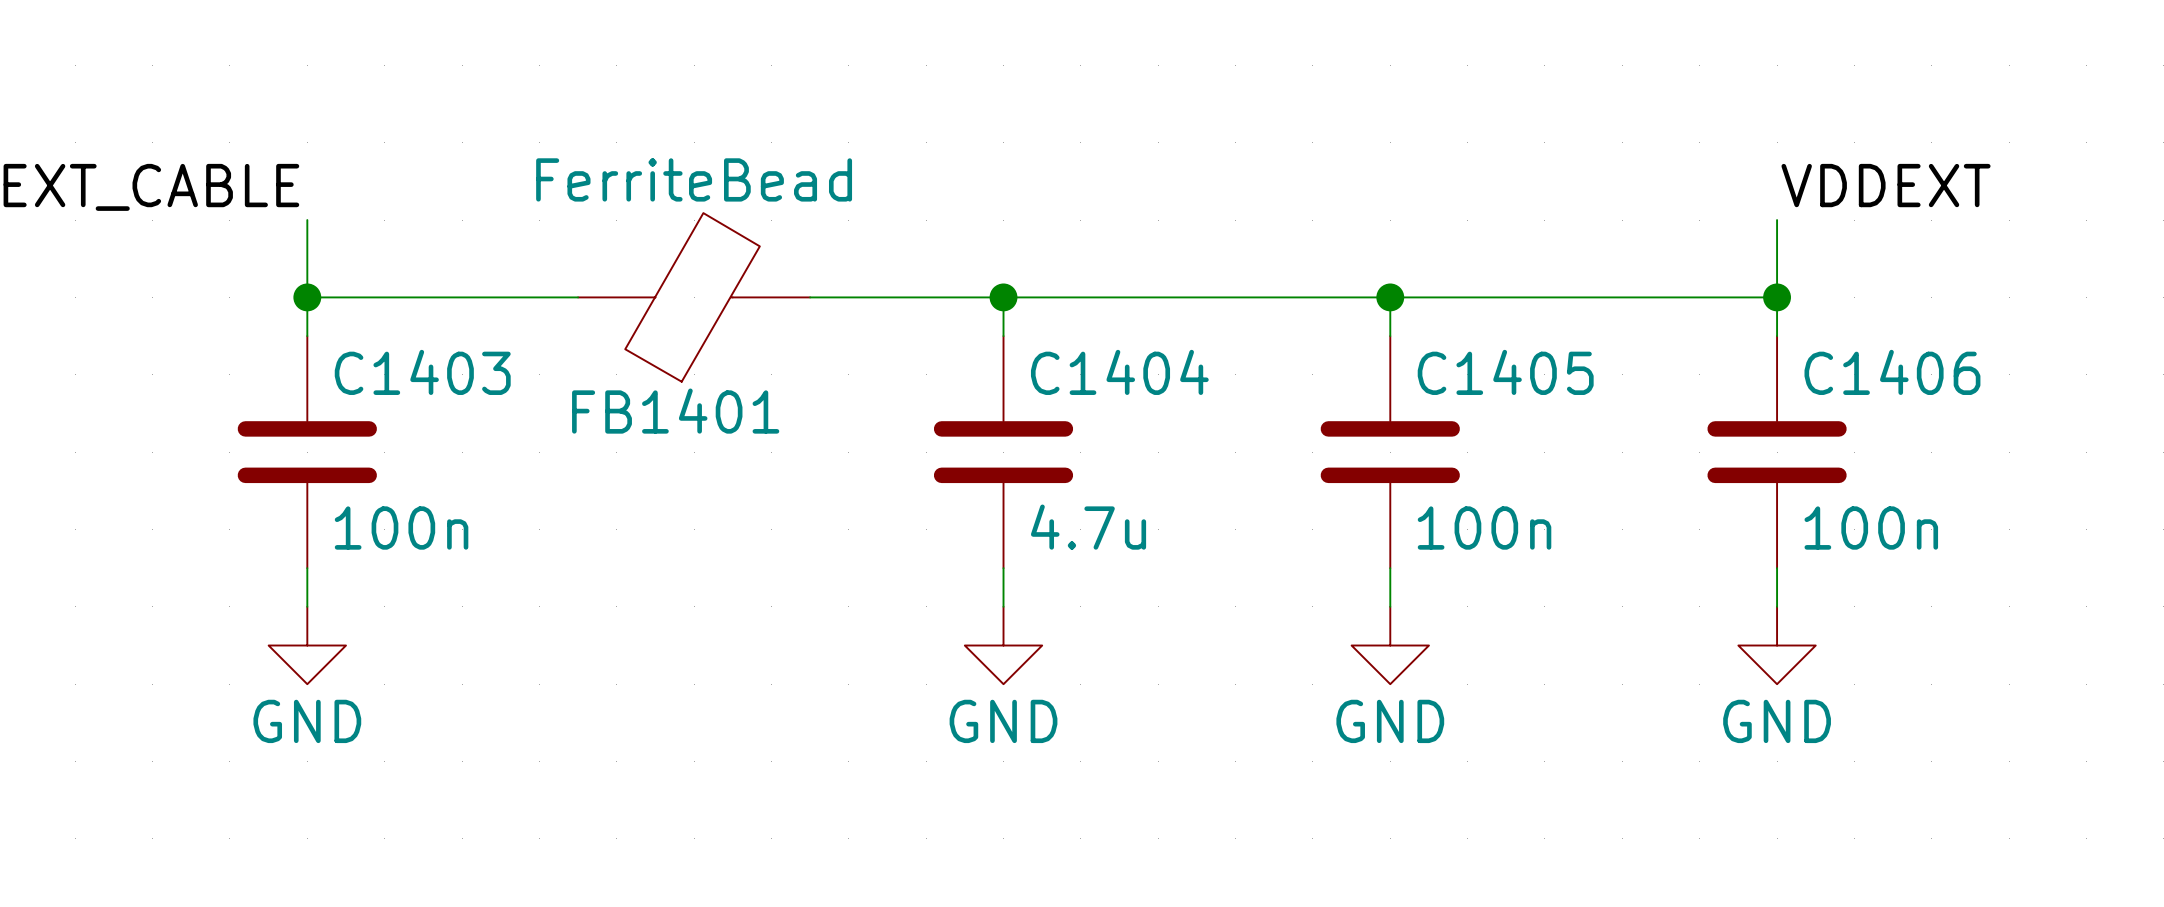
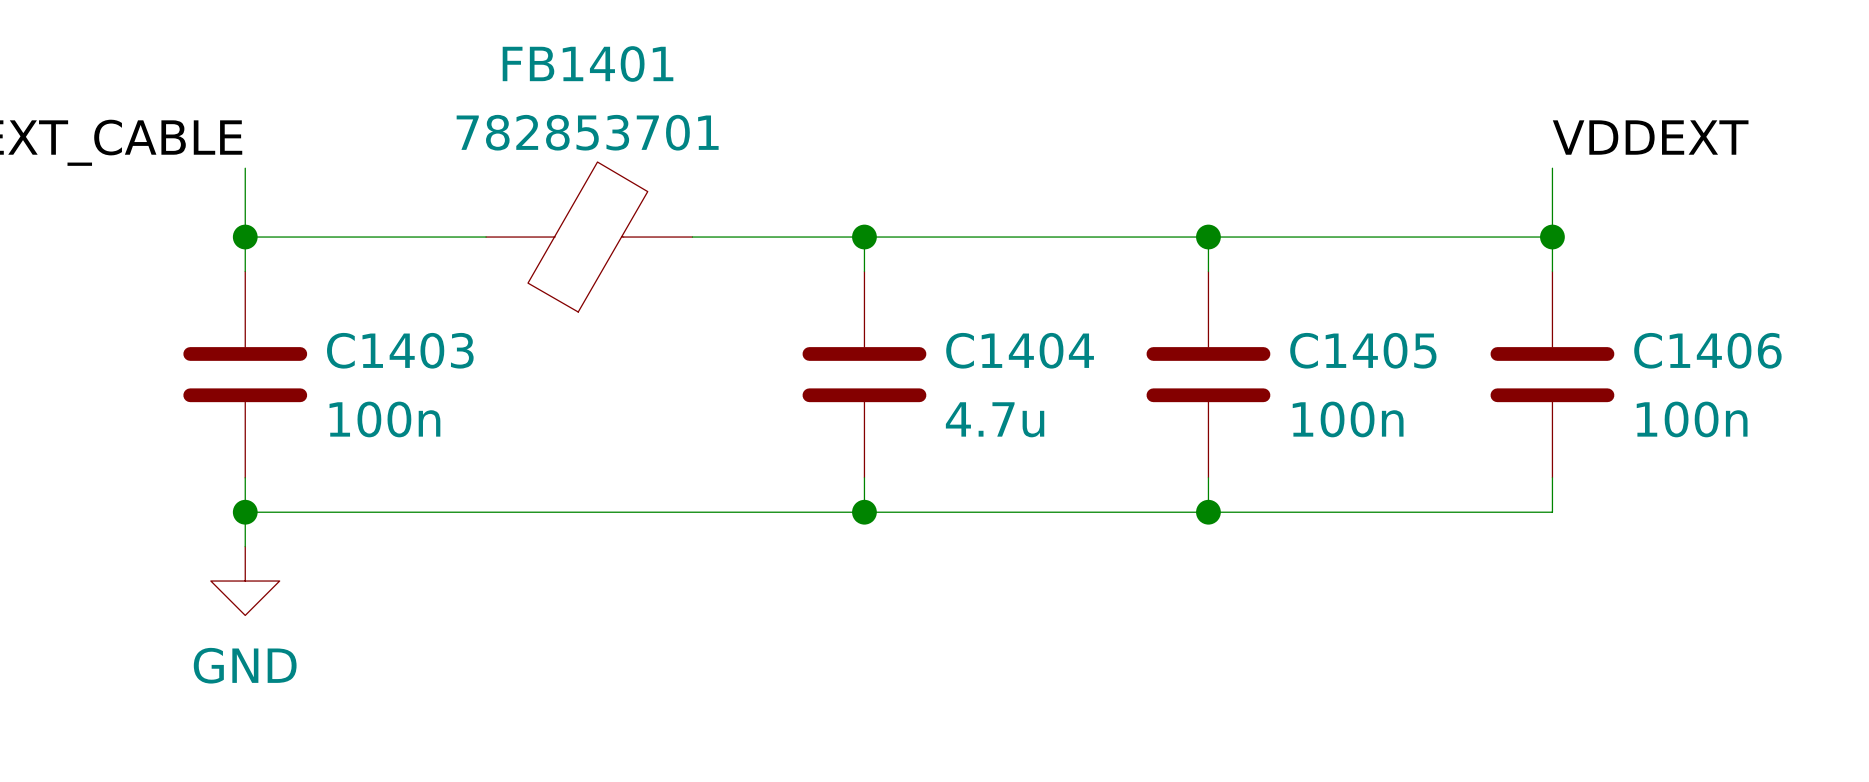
FB1401 value: FerriteBead (694, 179) -> 782853701 (587, 132)
C1403 name position: C1403 (422, 372) -> C1403 (400, 350)
C1404 name position: C1404 (1119, 372) -> C1404 (1020, 350)
C1405 name position: C1405 (1505, 372) -> C1405 (1363, 350)
C1406 name position: C1406 (1892, 372) -> C1406 (1707, 350)
FB1401 name position: FB1401 (675, 411) -> FB1401 (588, 64)
C1404 value position: 4.7u (1088, 527) -> 4.7u (995, 419)
C1403 value position: 100n (401, 528) -> 100n (384, 419)
C1405 value position: 100n (1484, 528) -> 100n (1348, 419)
C1406 value position: 100n (1871, 528) -> 100n (1692, 419)
junction: none -> (245, 512)
junction: none -> (864, 512)
junction: none -> (1208, 512)
wire: none -> (1552, 512) (245, 512) (245, 546)
power symbol position: GND (307, 645) -> GND (245, 581)
power symbol: GND (1003, 645) -> none
power symbol: GND (1390, 645) -> none
power symbol: GND (1777, 645) -> none
power symbol text position: GND (307, 721) -> GND (245, 665)

